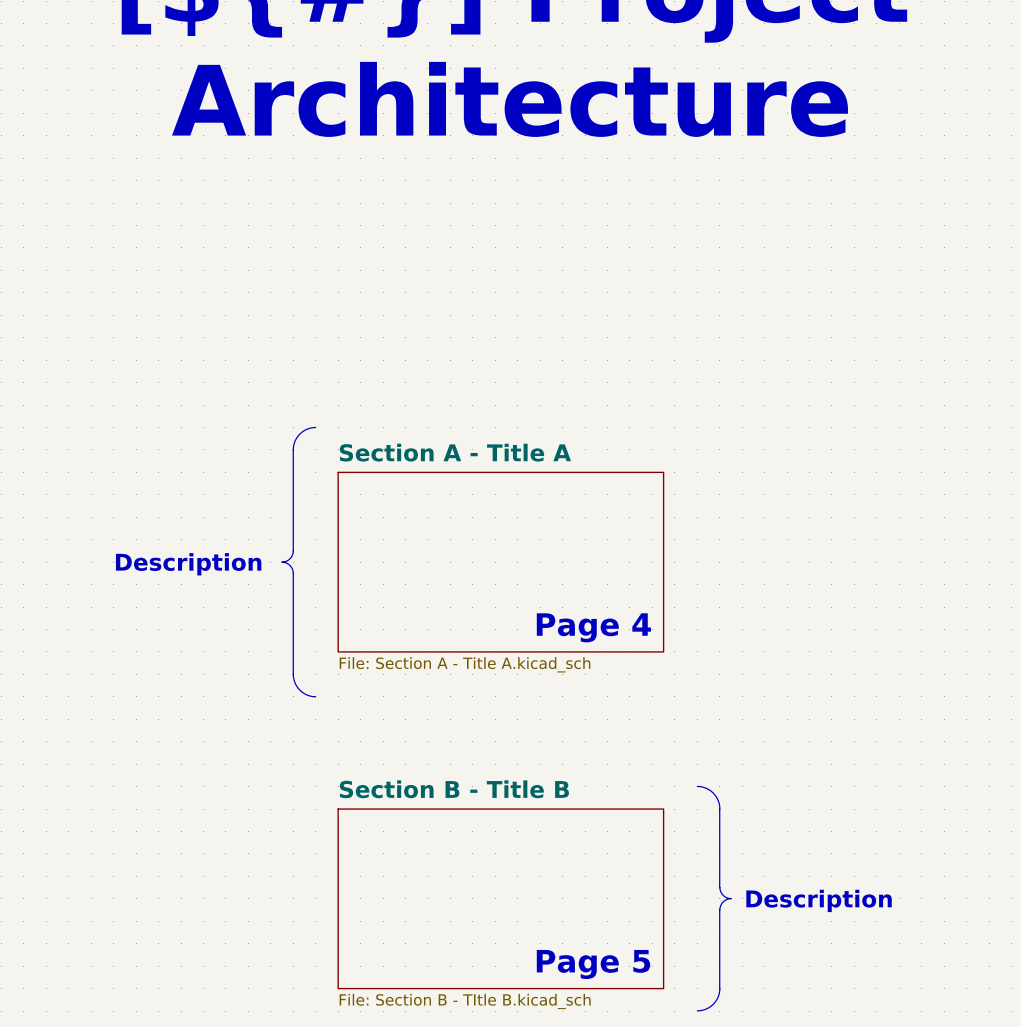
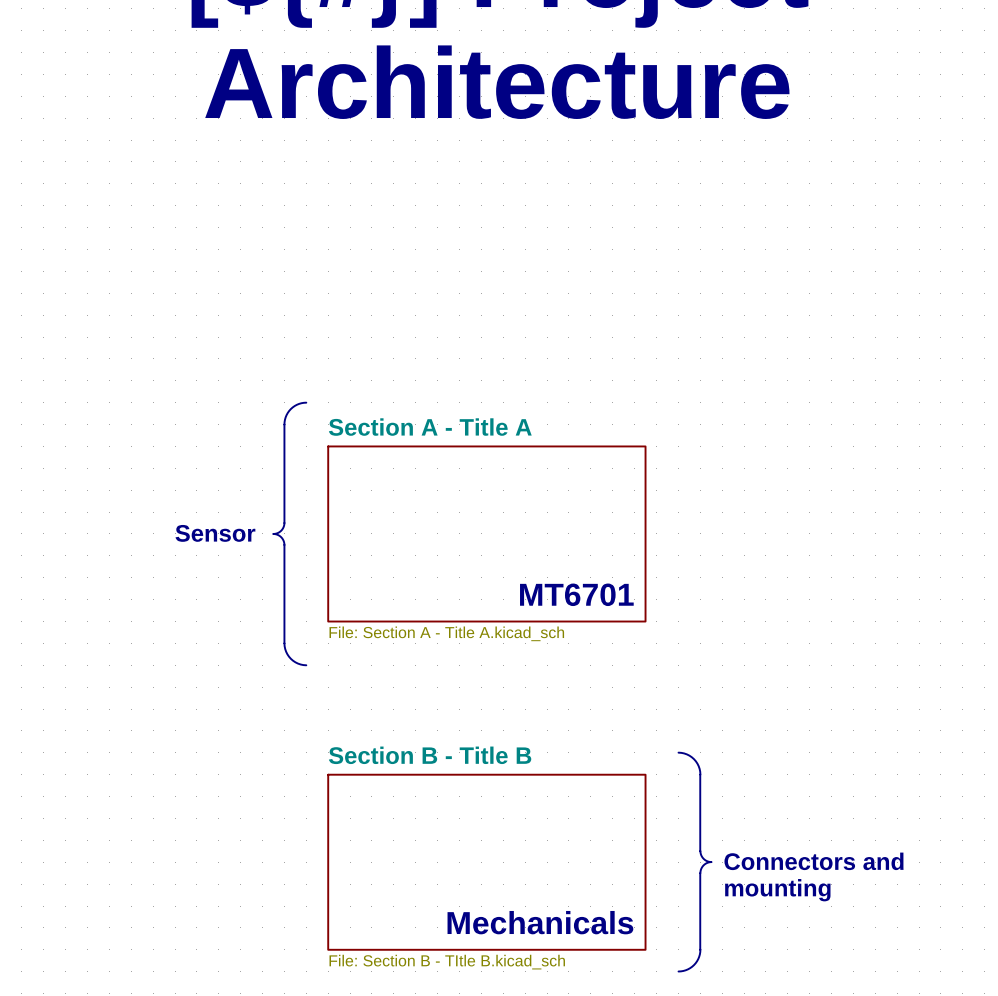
text: Description (188, 564) -> Sensor (215, 533)
text: Page 4 (593, 627) -> MT6701 (576, 594)
text: Description (819, 900) -> Connectors and (814, 861)
text: none -> mounting (777, 890)
text: Page 5 (593, 964) -> Mechanicals (540, 922)

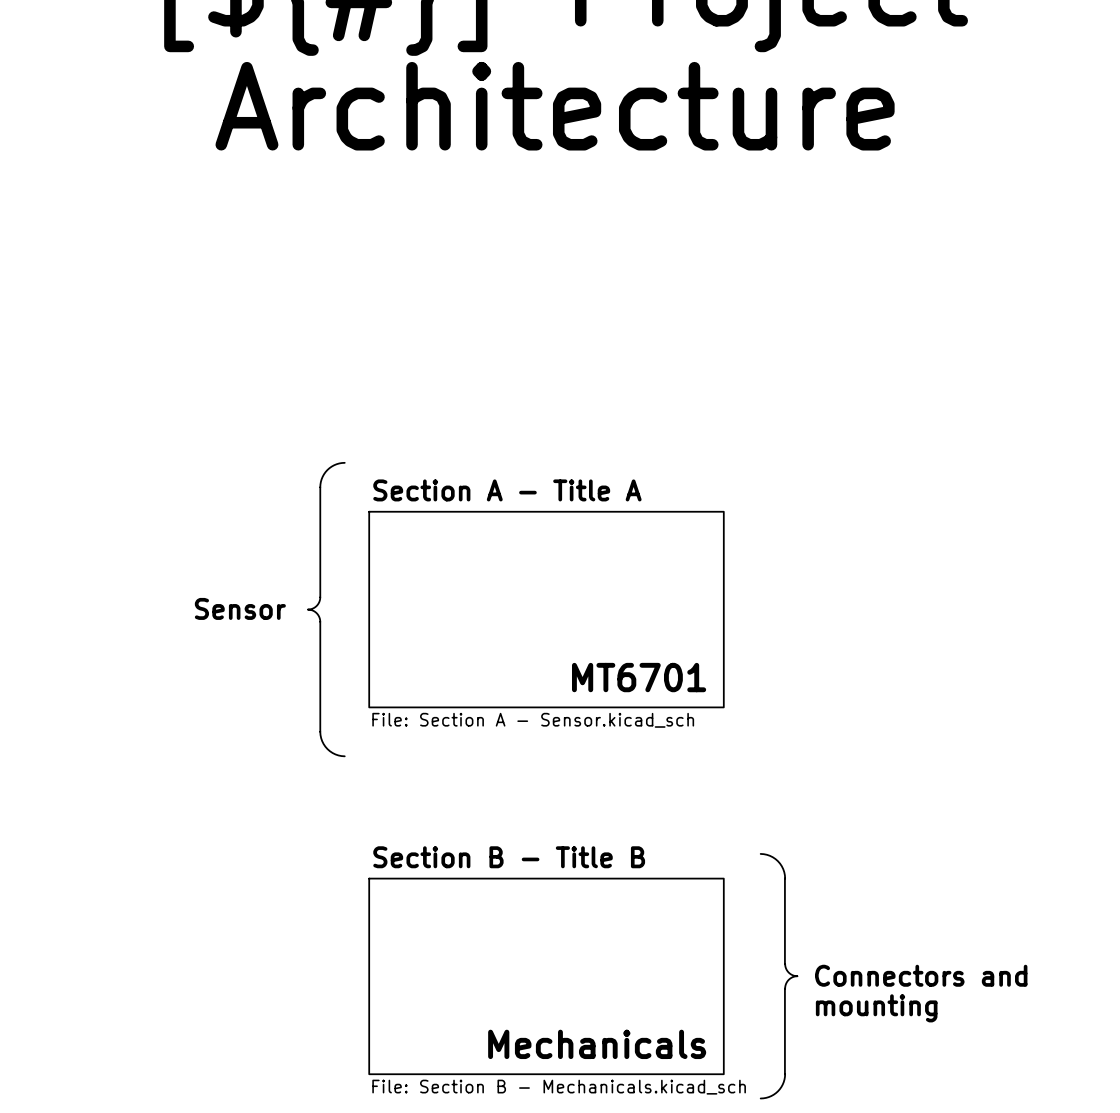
sheet Section A - Title A value: File: Section A - Title A.kicad_sch (446, 633) -> File: Section A - Sensor.kicad_sch (533, 720)
sheet Section B - Title B value: File: Section B - TItle B.kicad_sch (447, 962) -> File: Section B - Mechanicals.kicad_sch (559, 1087)

